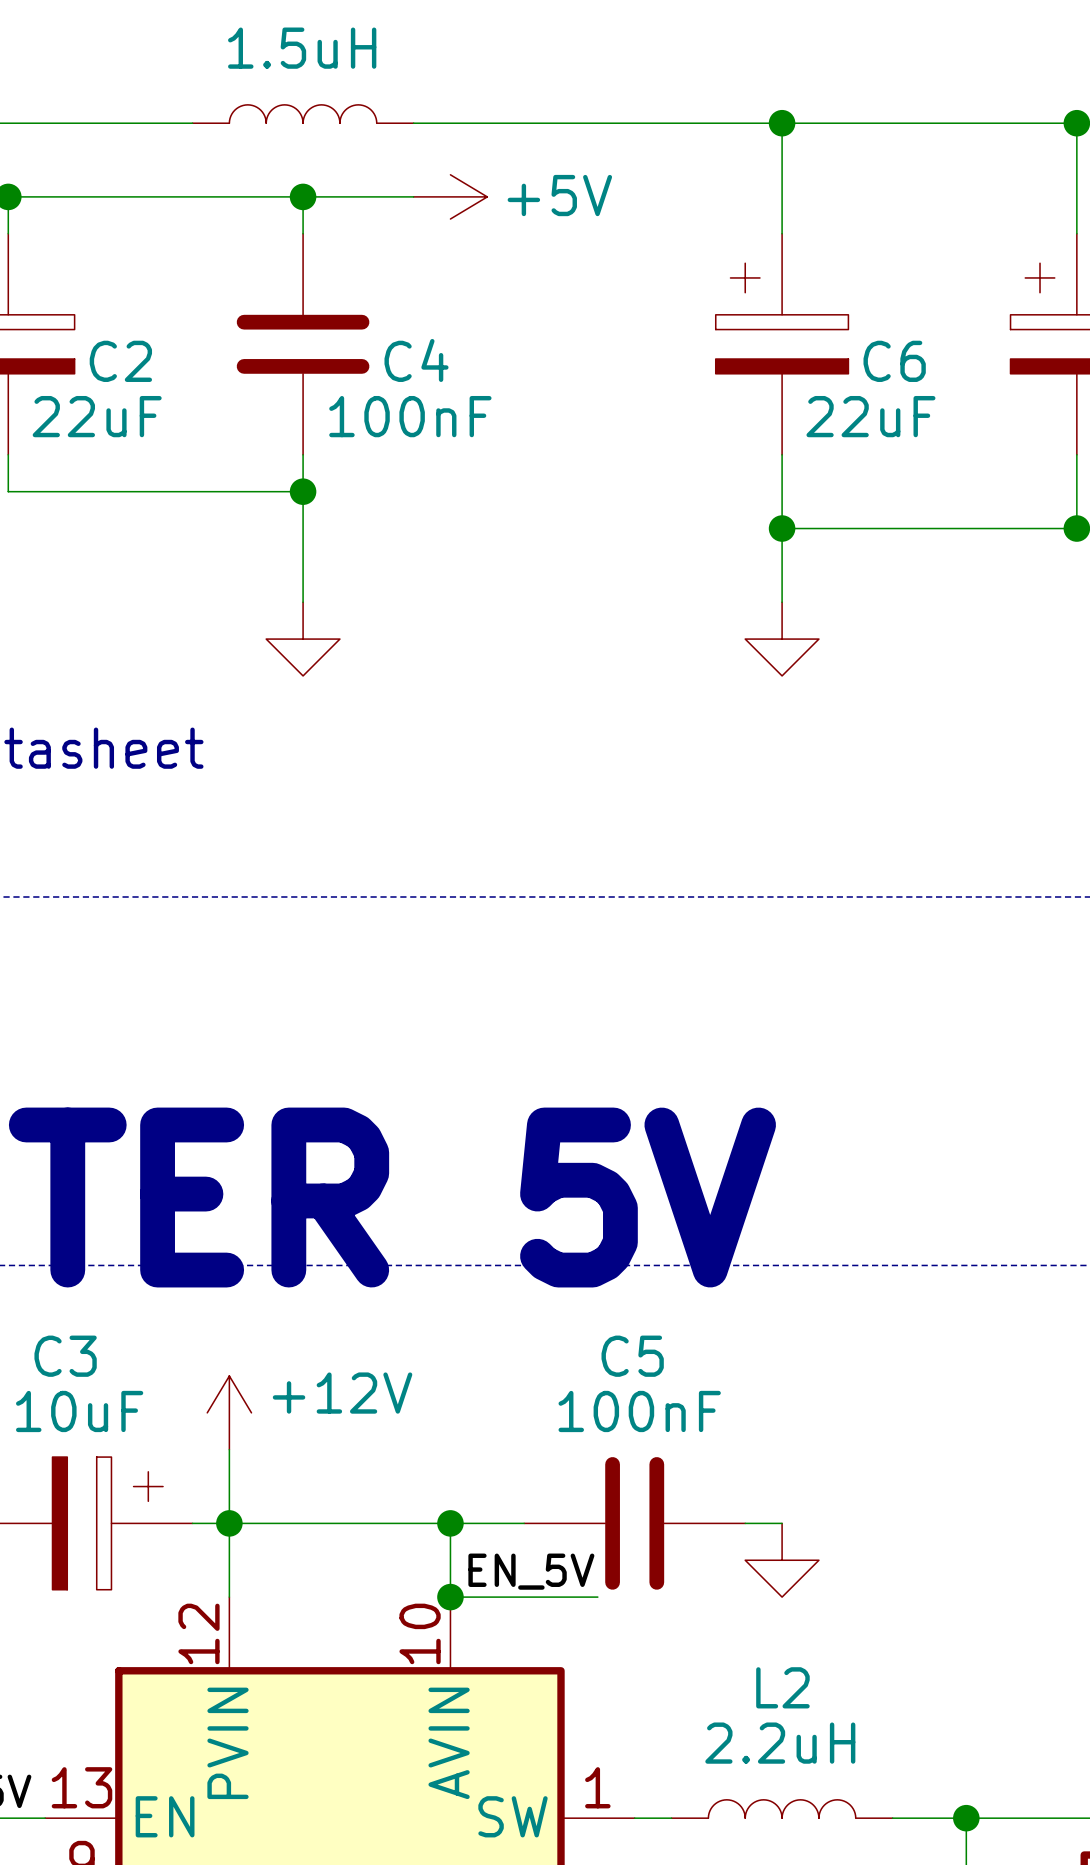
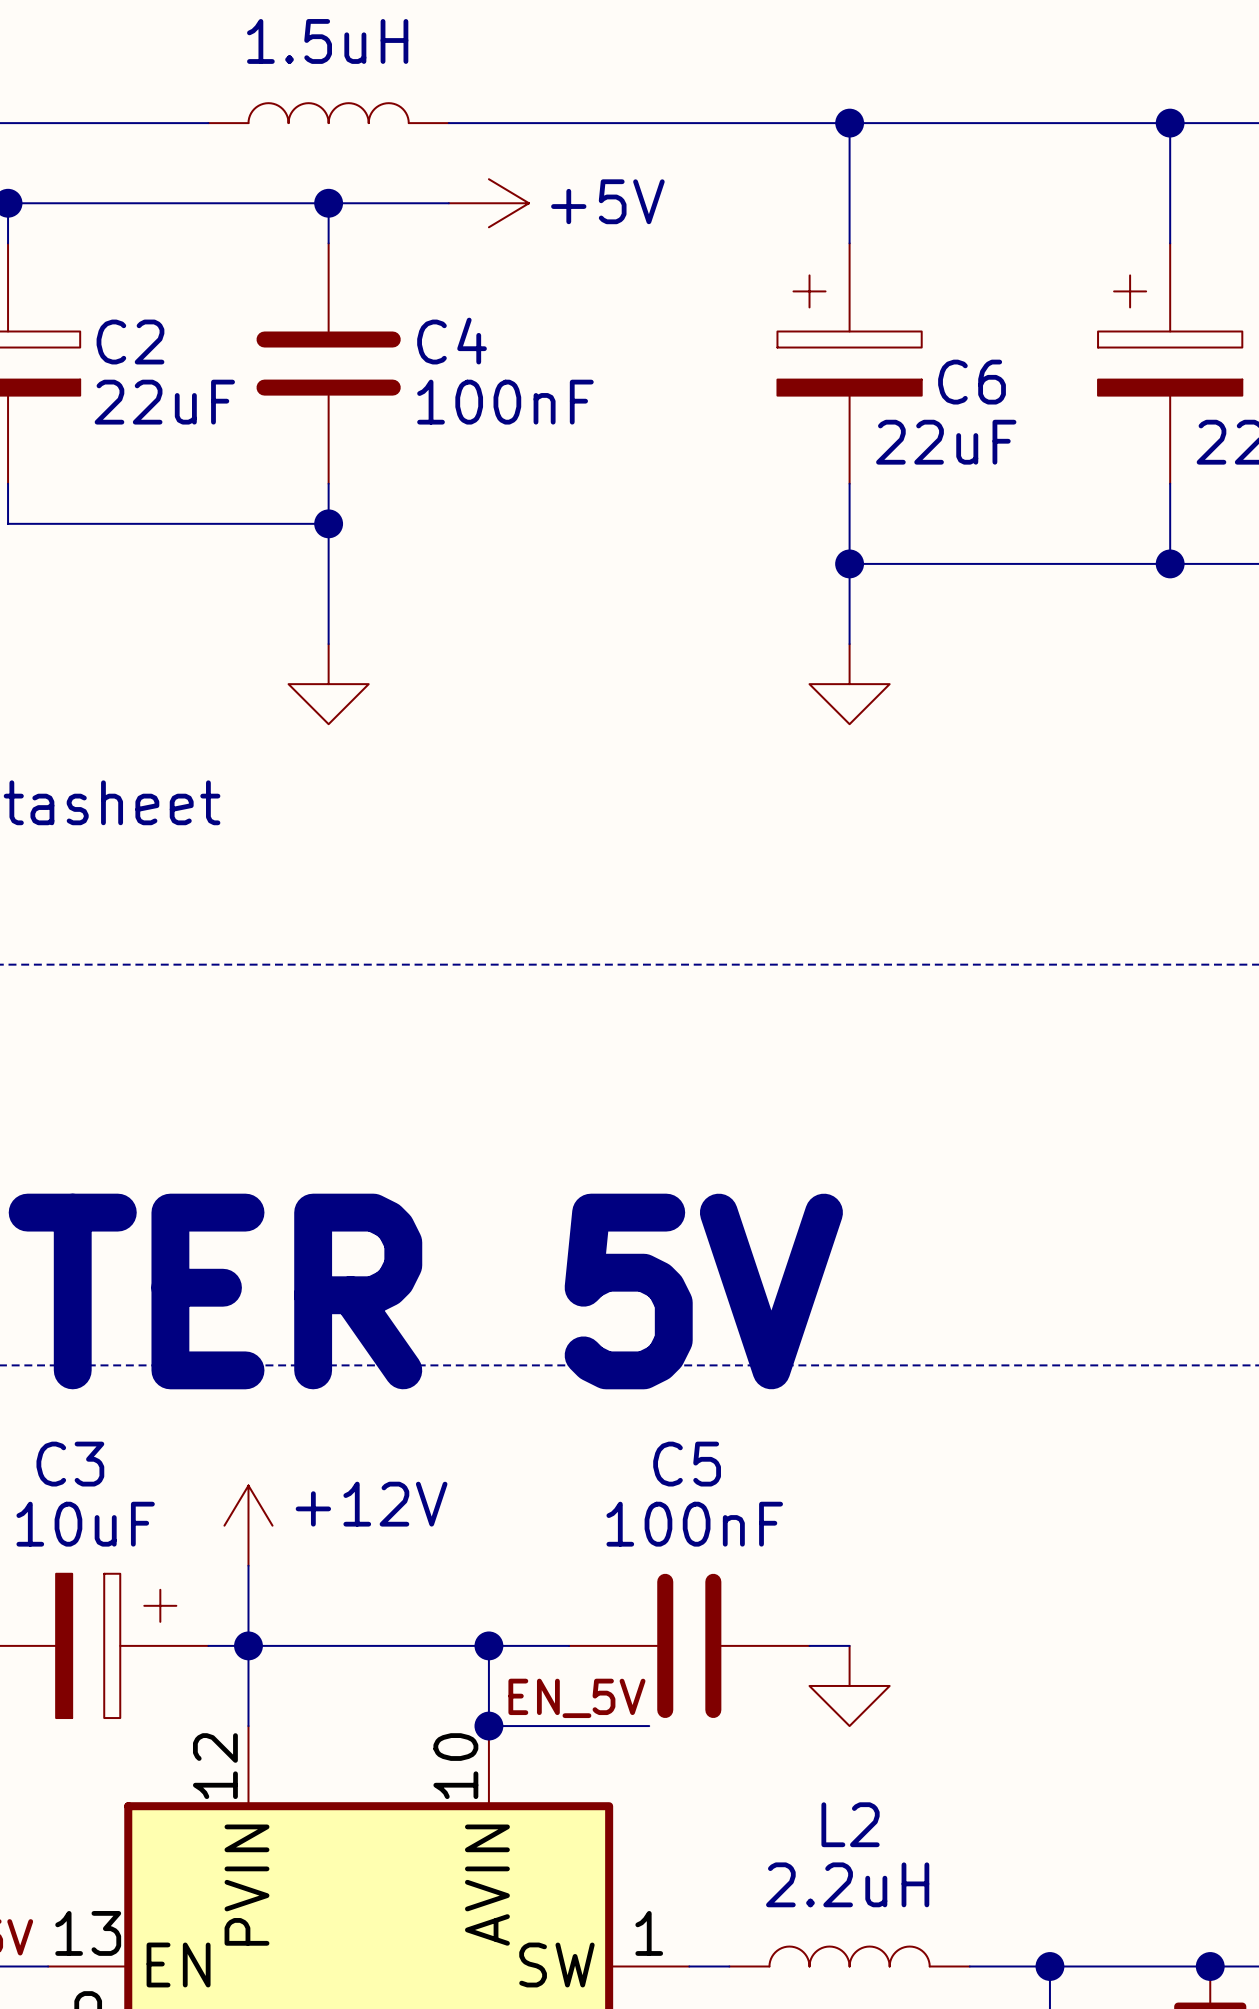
C4 name position: C4 (416, 360) -> C4 (452, 341)
C2 name position: C2 (120, 361) -> C2 (130, 342)
C2 value position: 22uF (97, 416) -> 22uF (164, 402)
C4 value position: 100nF (410, 416) -> 100nF (505, 402)

